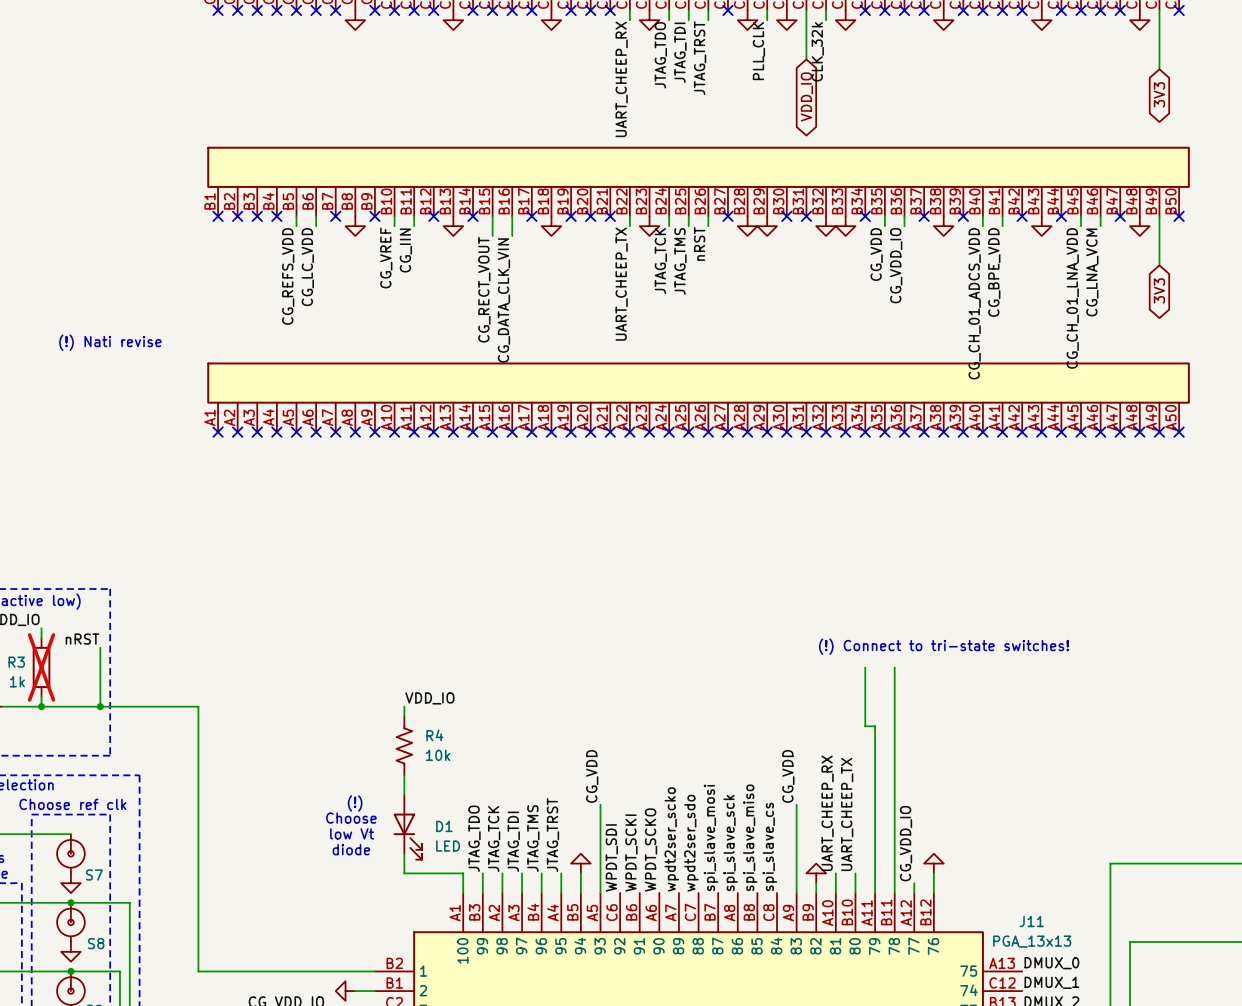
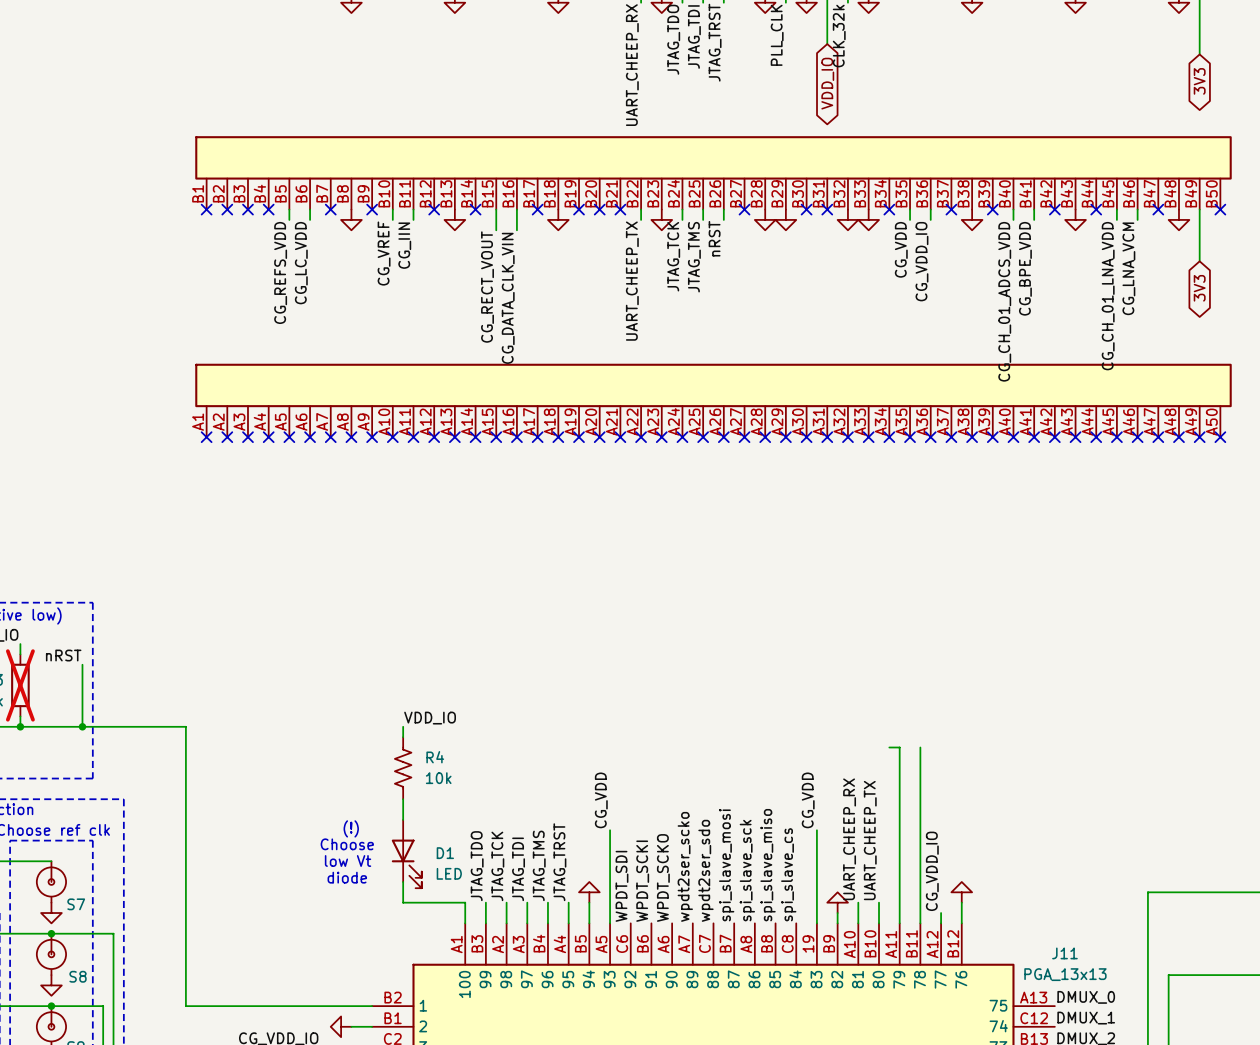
text: (!) Nati revise (110, 342) -> none
text: (!) Connect to tri-state switches! (943, 646) -> none
wire: (865, 667) (865, 726) -> none
wire: (894, 667) (894, 726) -> none
J11 pin number: A9 (788, 913) -> 19 (808, 944)

